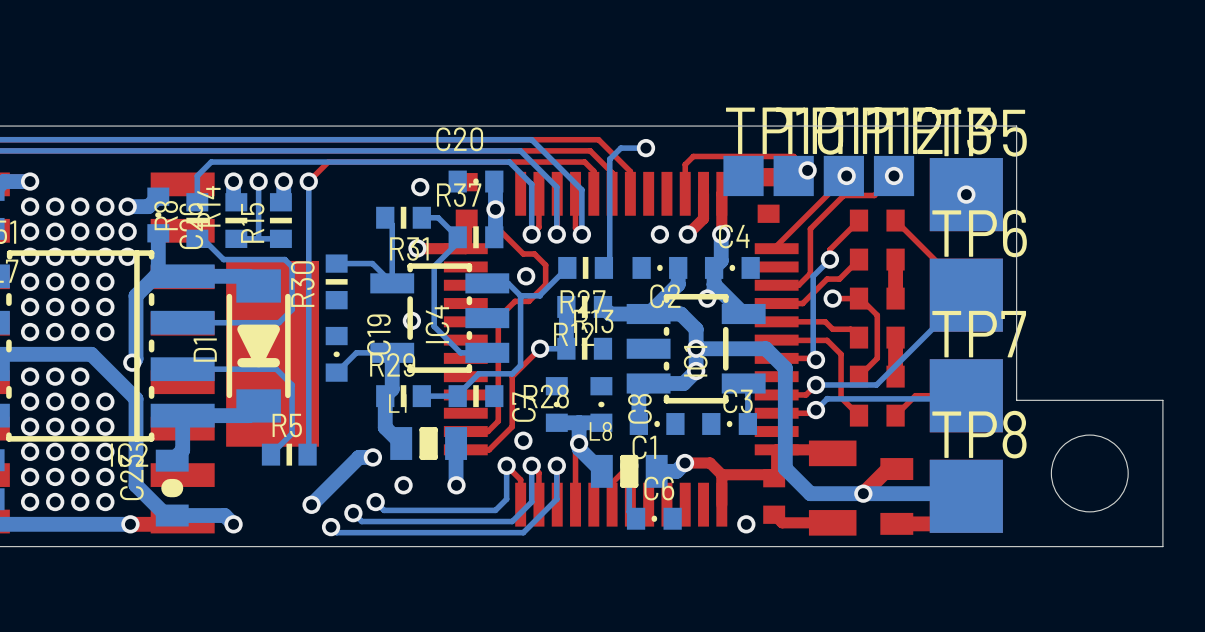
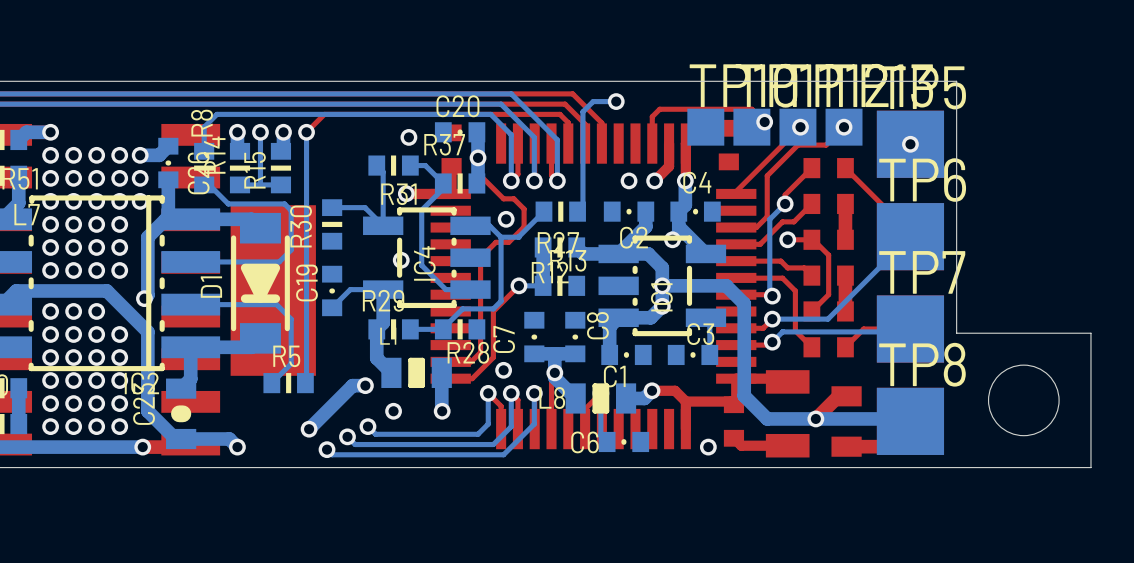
C20 name position: C20 (459, 139) -> C20 (457, 106)
R8 name position: R8 (166, 215) -> R8 (202, 123)
C19 name position: C19 (378, 334) -> C19 (306, 282)
R28 name position: R28 (546, 396) -> R28 (468, 352)
C8 name position: C8 (639, 408) -> C8 (597, 325)
L8 name position: L8 (600, 431) -> L8 (552, 398)
C6 name position: C6 (659, 488) -> C6 (584, 442)

